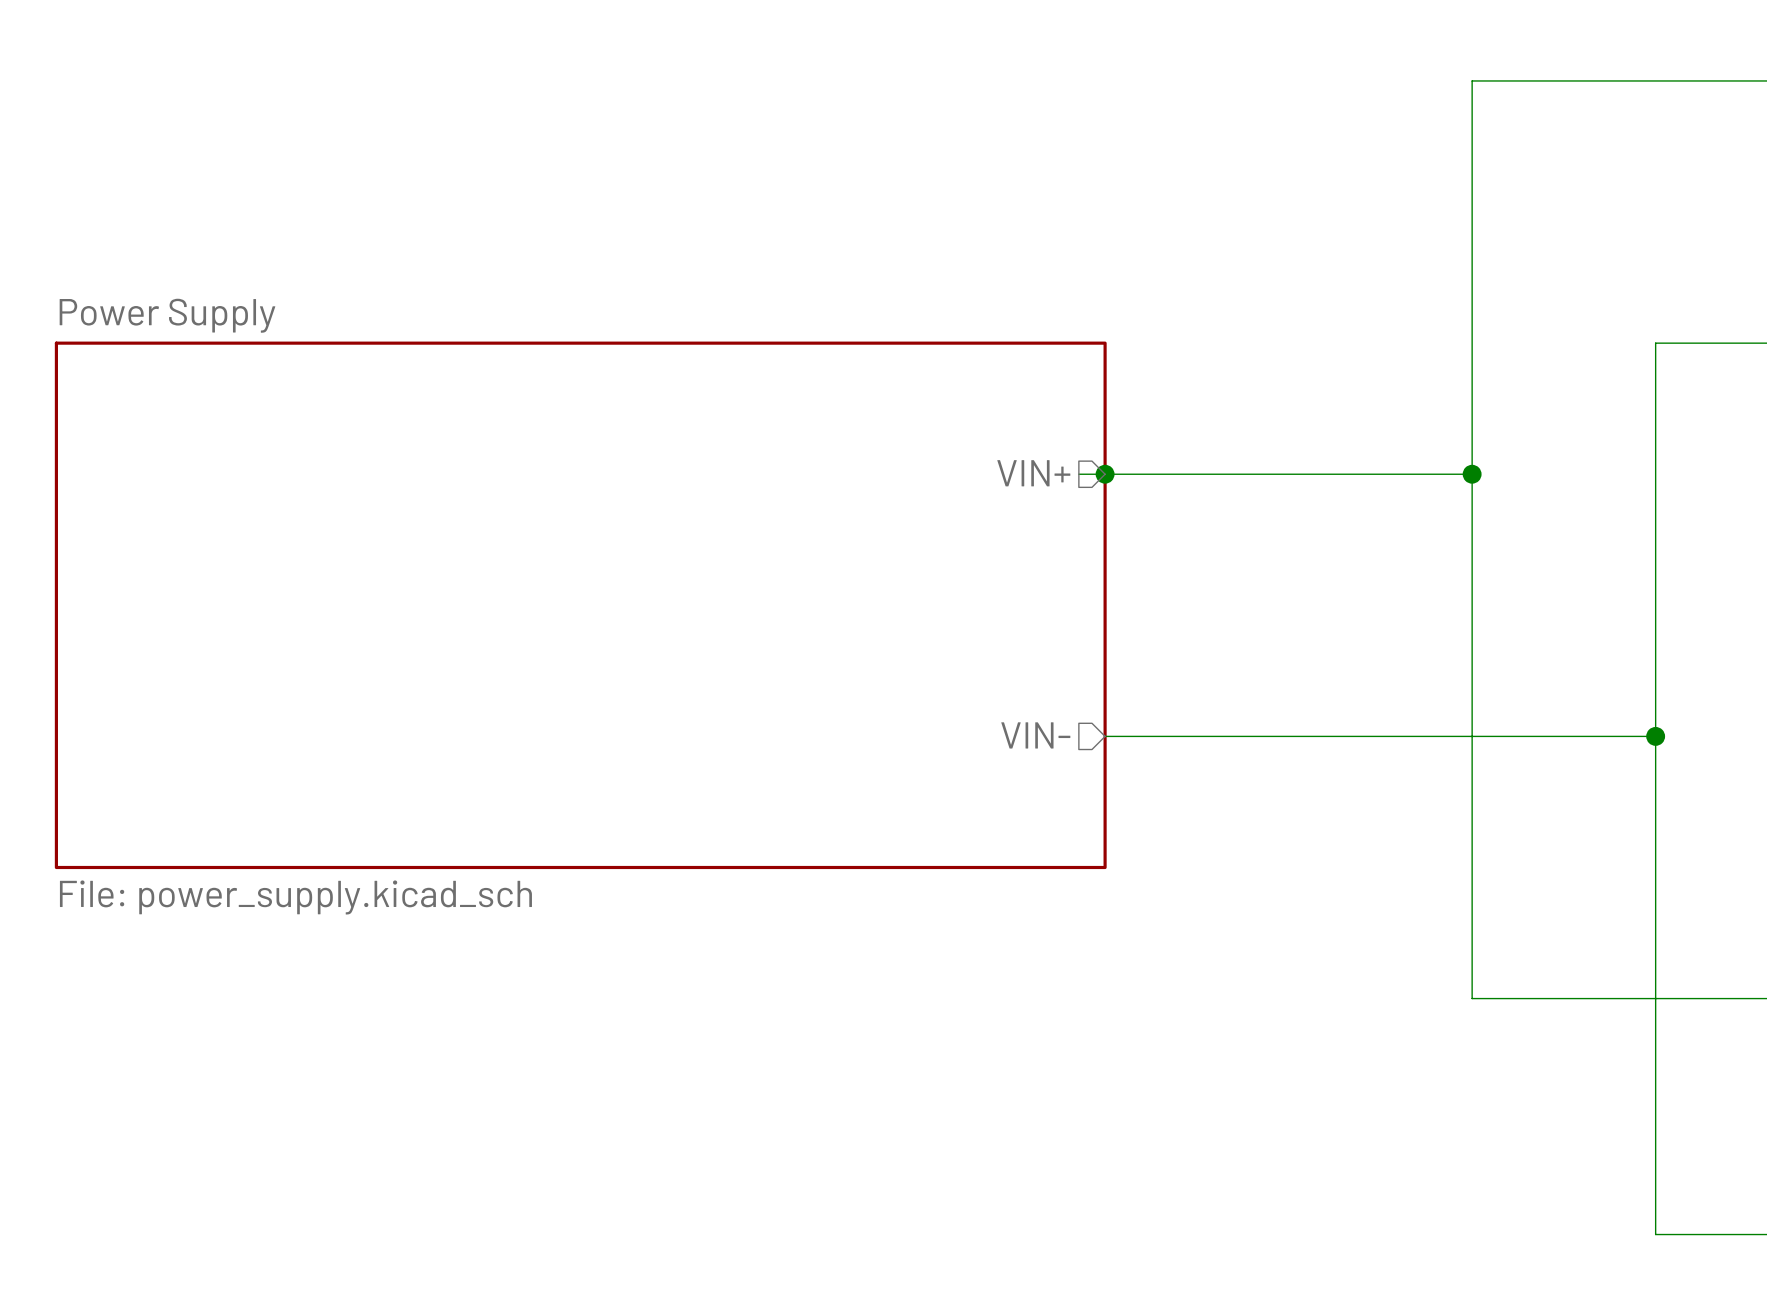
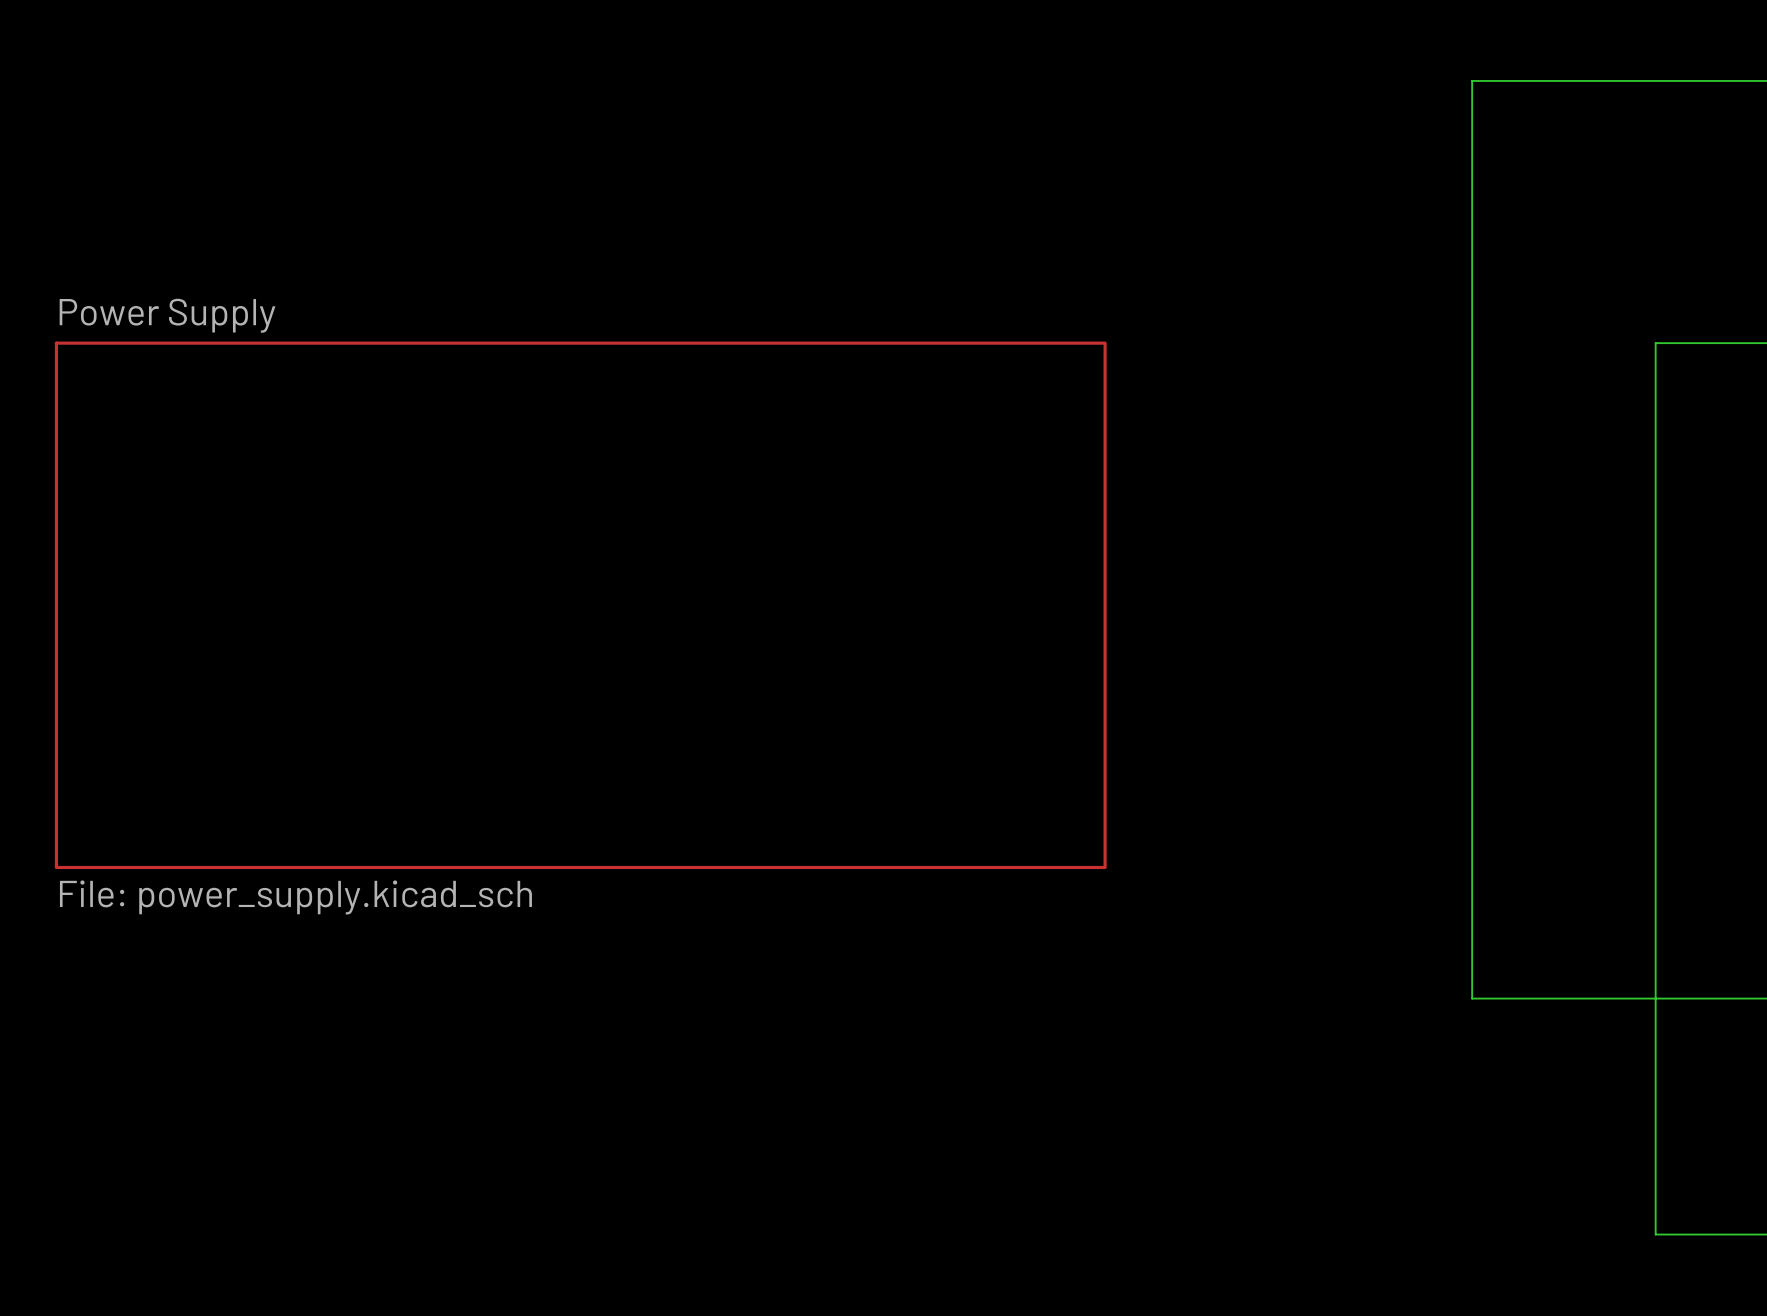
sheet pin: VIN+ (1033, 473) -> none
wire: (1078, 474) (1472, 474) -> none
junction: (1105, 474) -> none
junction: (1472, 474) -> none
sheet pin: VIN- (1035, 735) -> none
wire: (1105, 736) (1655, 736) -> none
junction: (1655, 736) -> none

